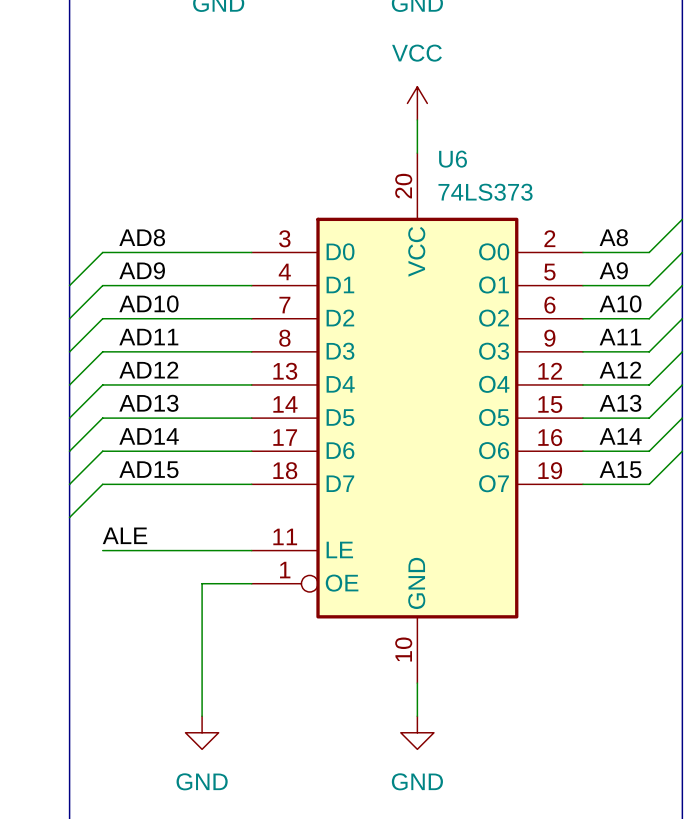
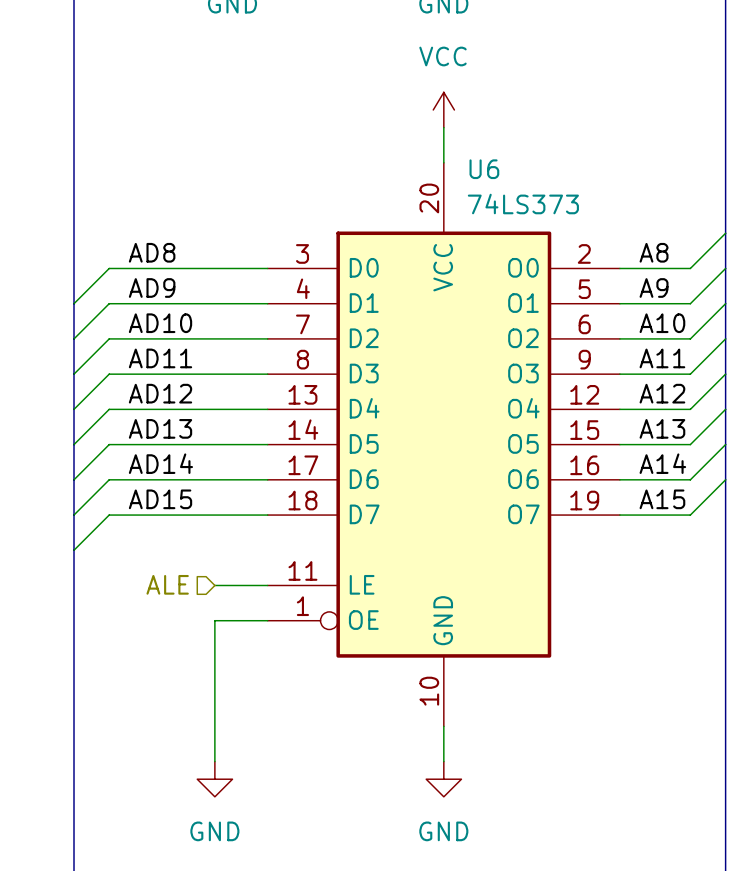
label: ALE (124, 535) -> none
hierarchical label: none -> ALE (167, 584)
wire: (102, 550) (202, 550) -> none

